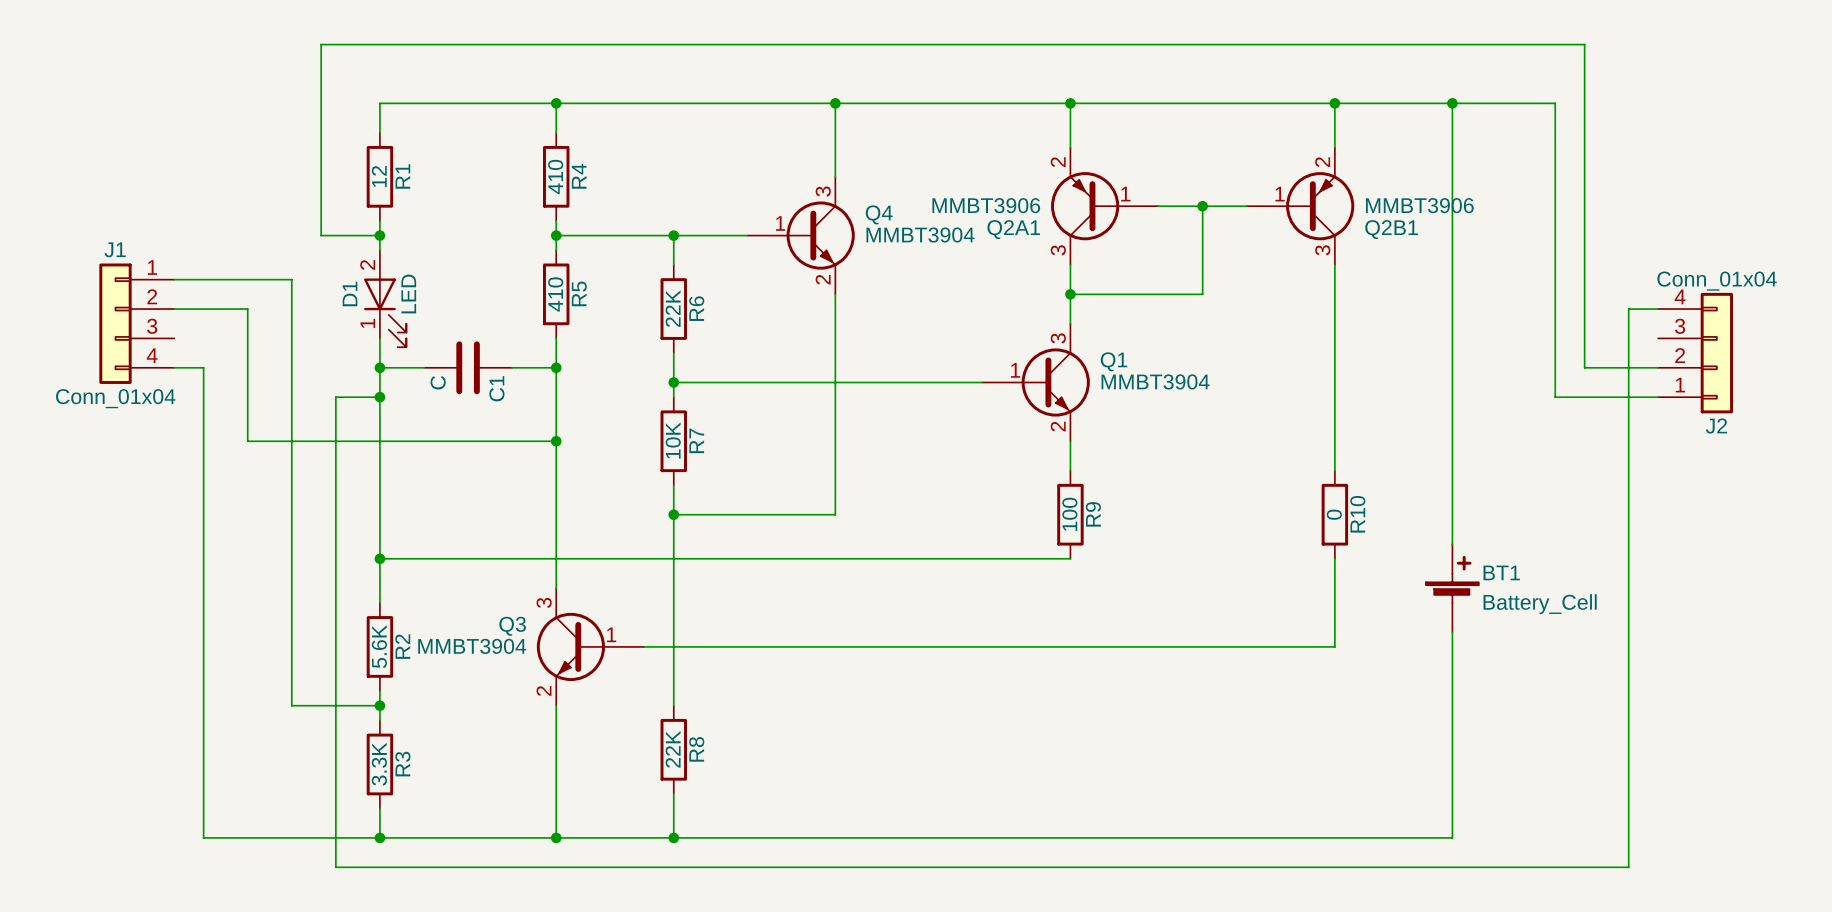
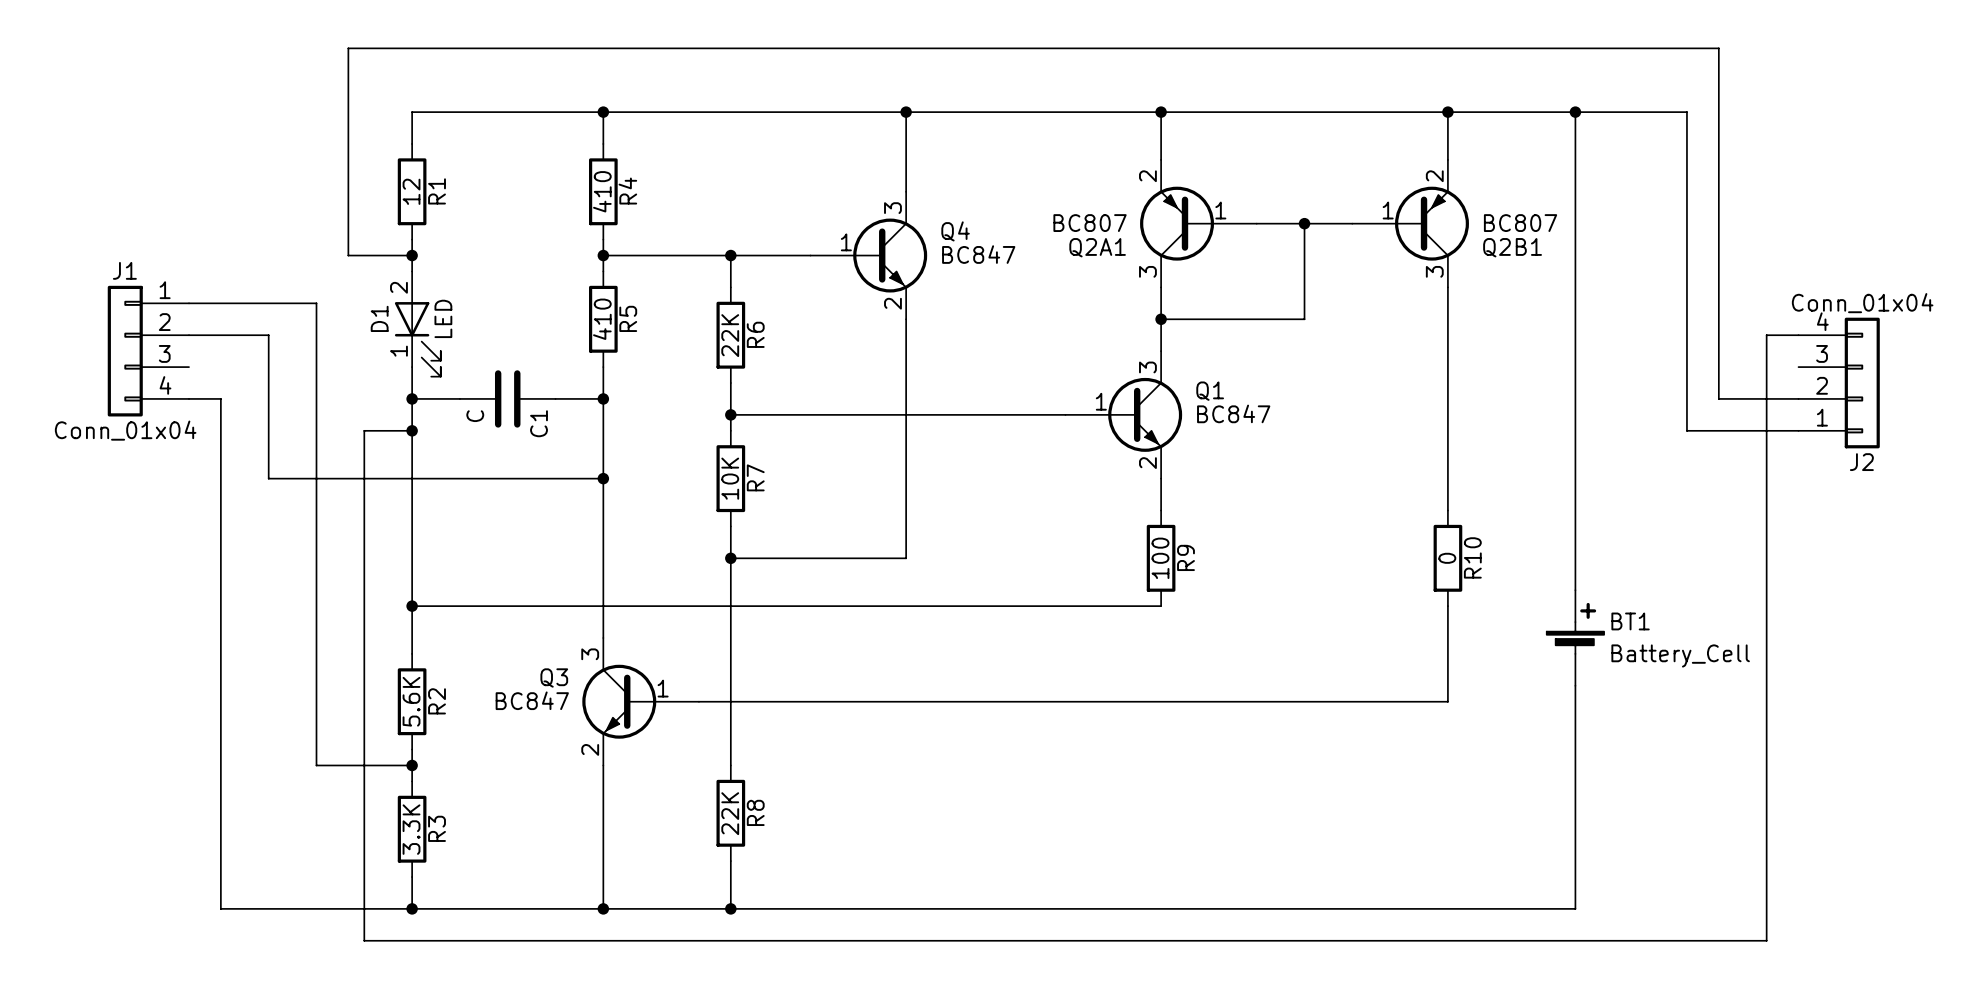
Q2A1 value: MMBT3906 (986, 205) -> BC807 (1090, 223)
Q2B1 value: MMBT3906 (1419, 205) -> BC807 (1520, 223)
Q4 value: MMBT3904 (920, 235) -> BC847 (978, 254)
Q1 value: MMBT3904 (1155, 381) -> BC847 (1233, 413)
Q3 value: MMBT3904 (472, 646) -> BC847 (532, 700)

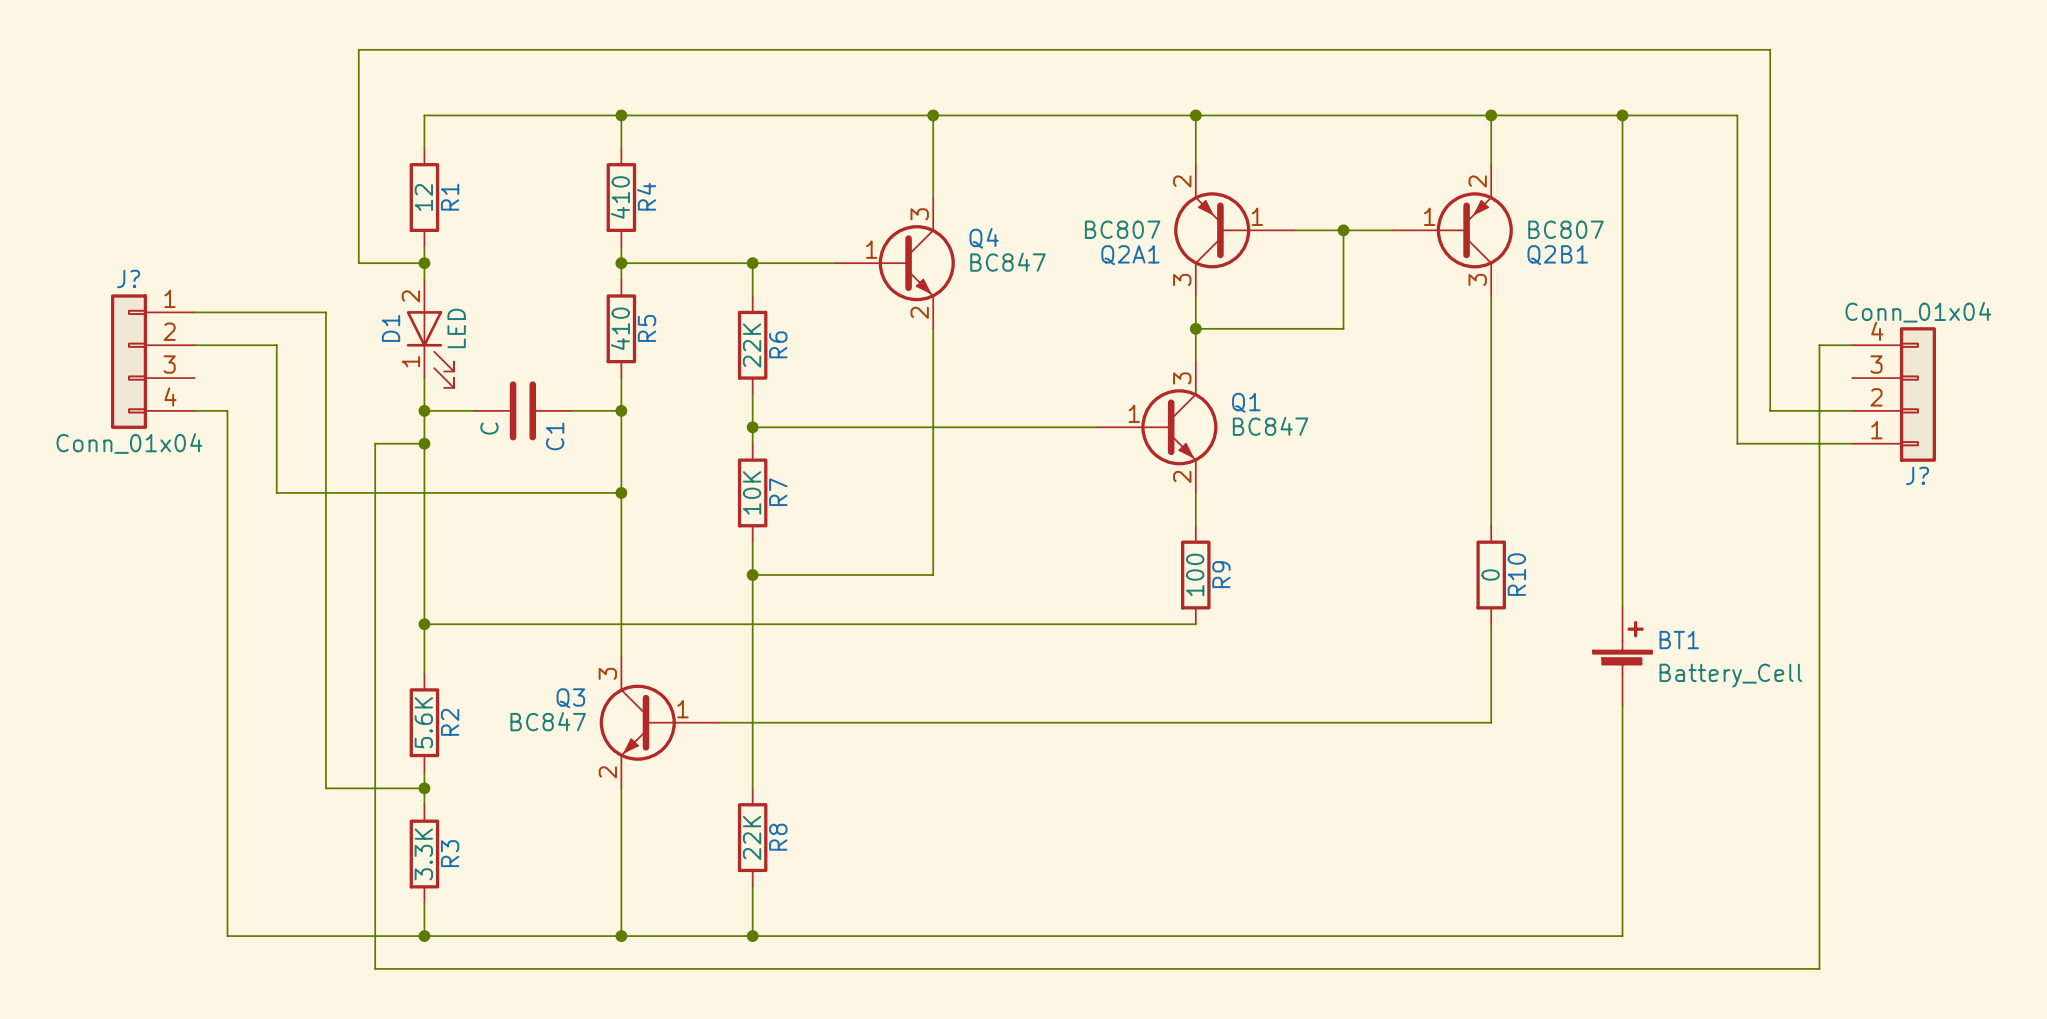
J1 name: J1 (124, 270) -> J? (128, 278)
J2 name: J2 (1861, 462) -> J? (1917, 475)

